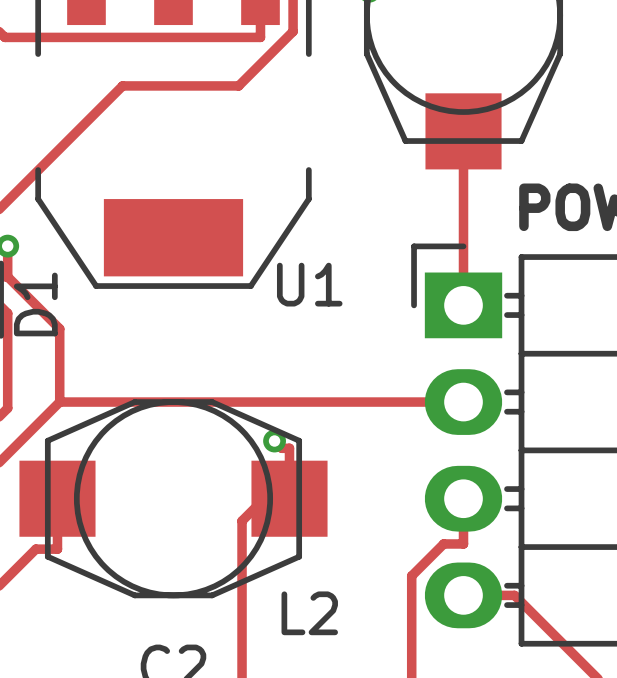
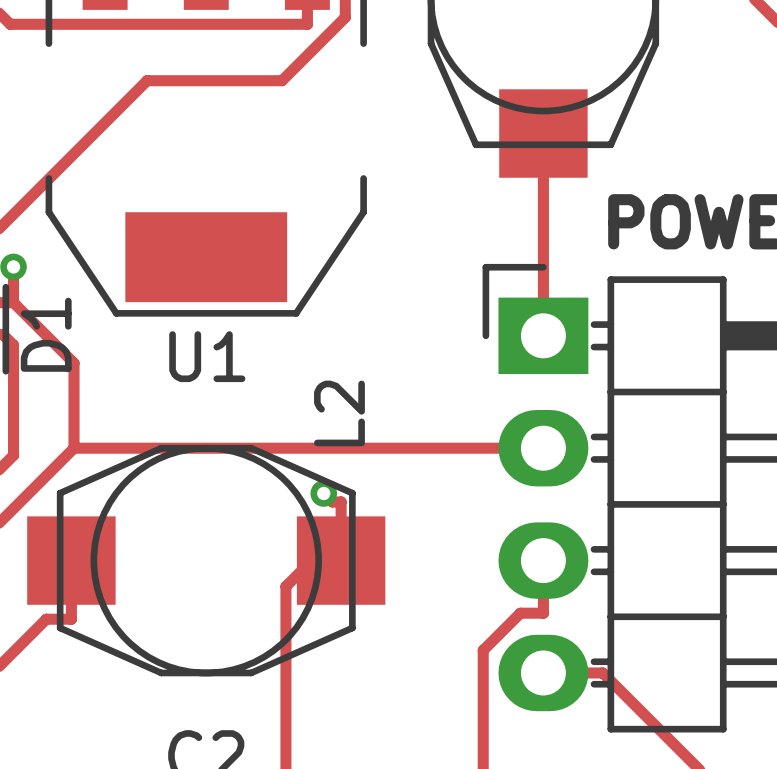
U1 name position: U1 (309, 284) -> U1 (207, 356)
L2 name rotation: 0° (309, 613) -> 90° counterclockwise (339, 413)
L2 name position: L2 (309, 613) -> L2 (339, 413)

